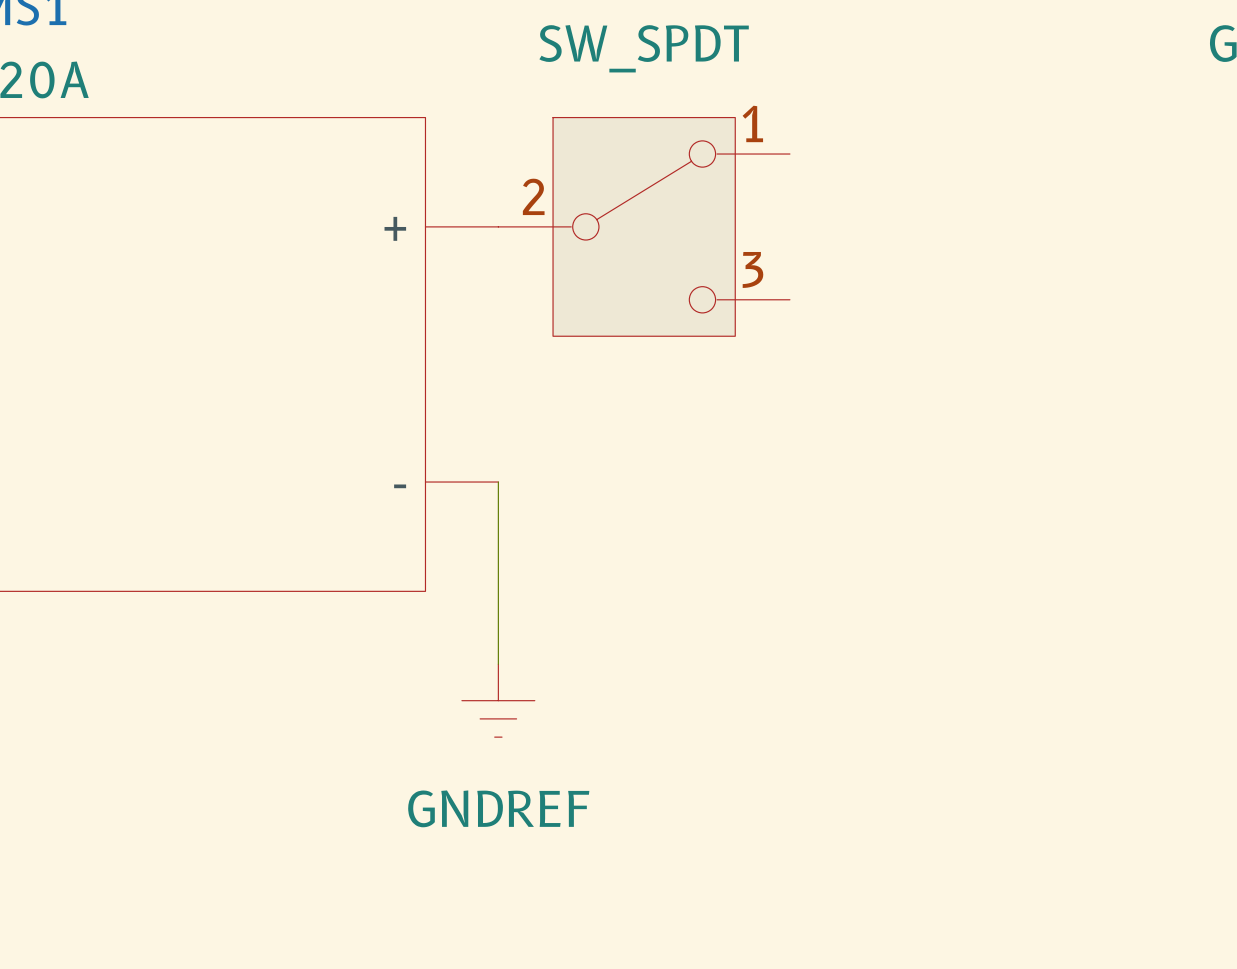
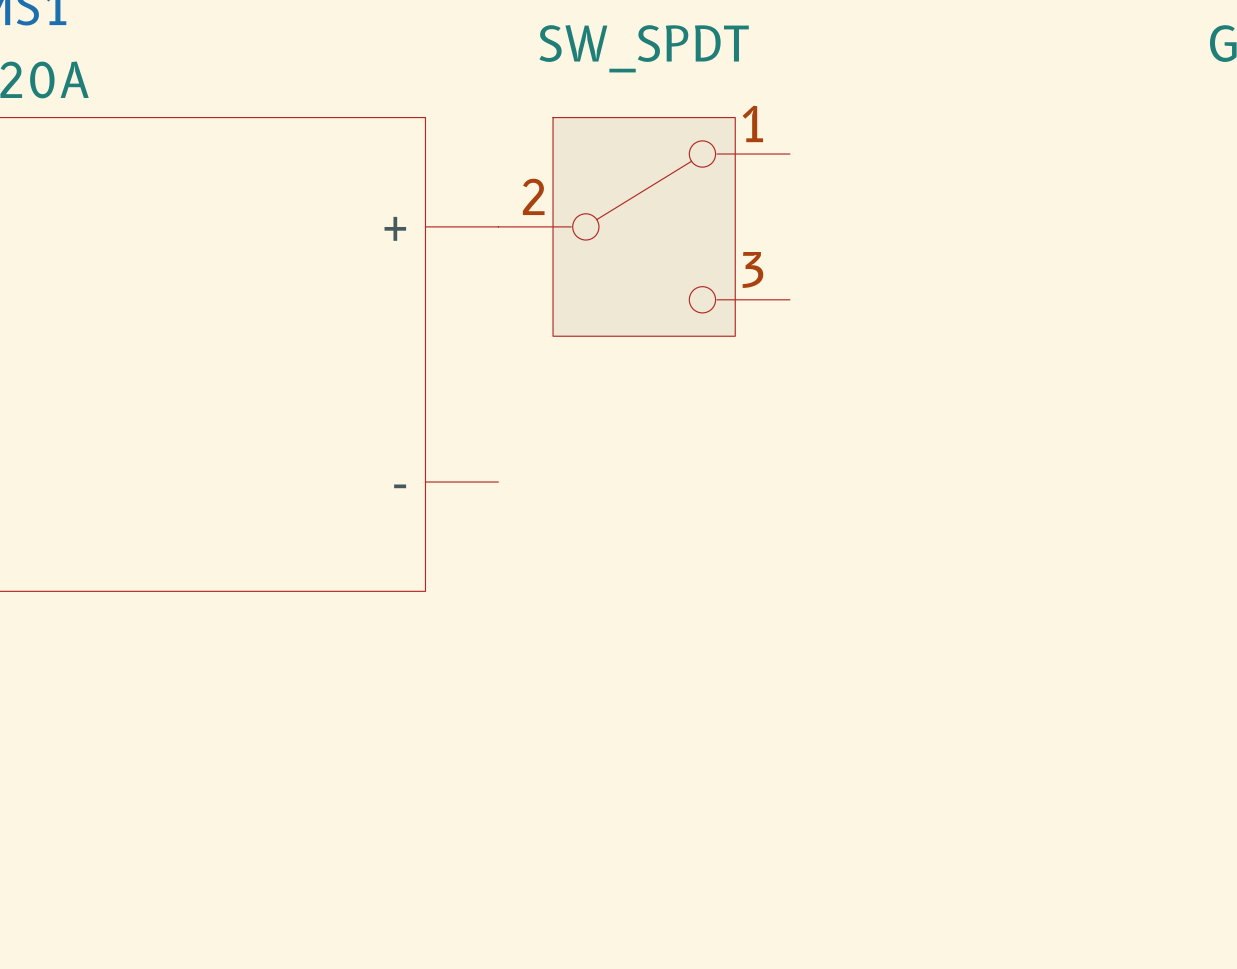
wire: (498, 482) (498, 664) -> none
power symbol: GNDREF (498, 700) -> none

